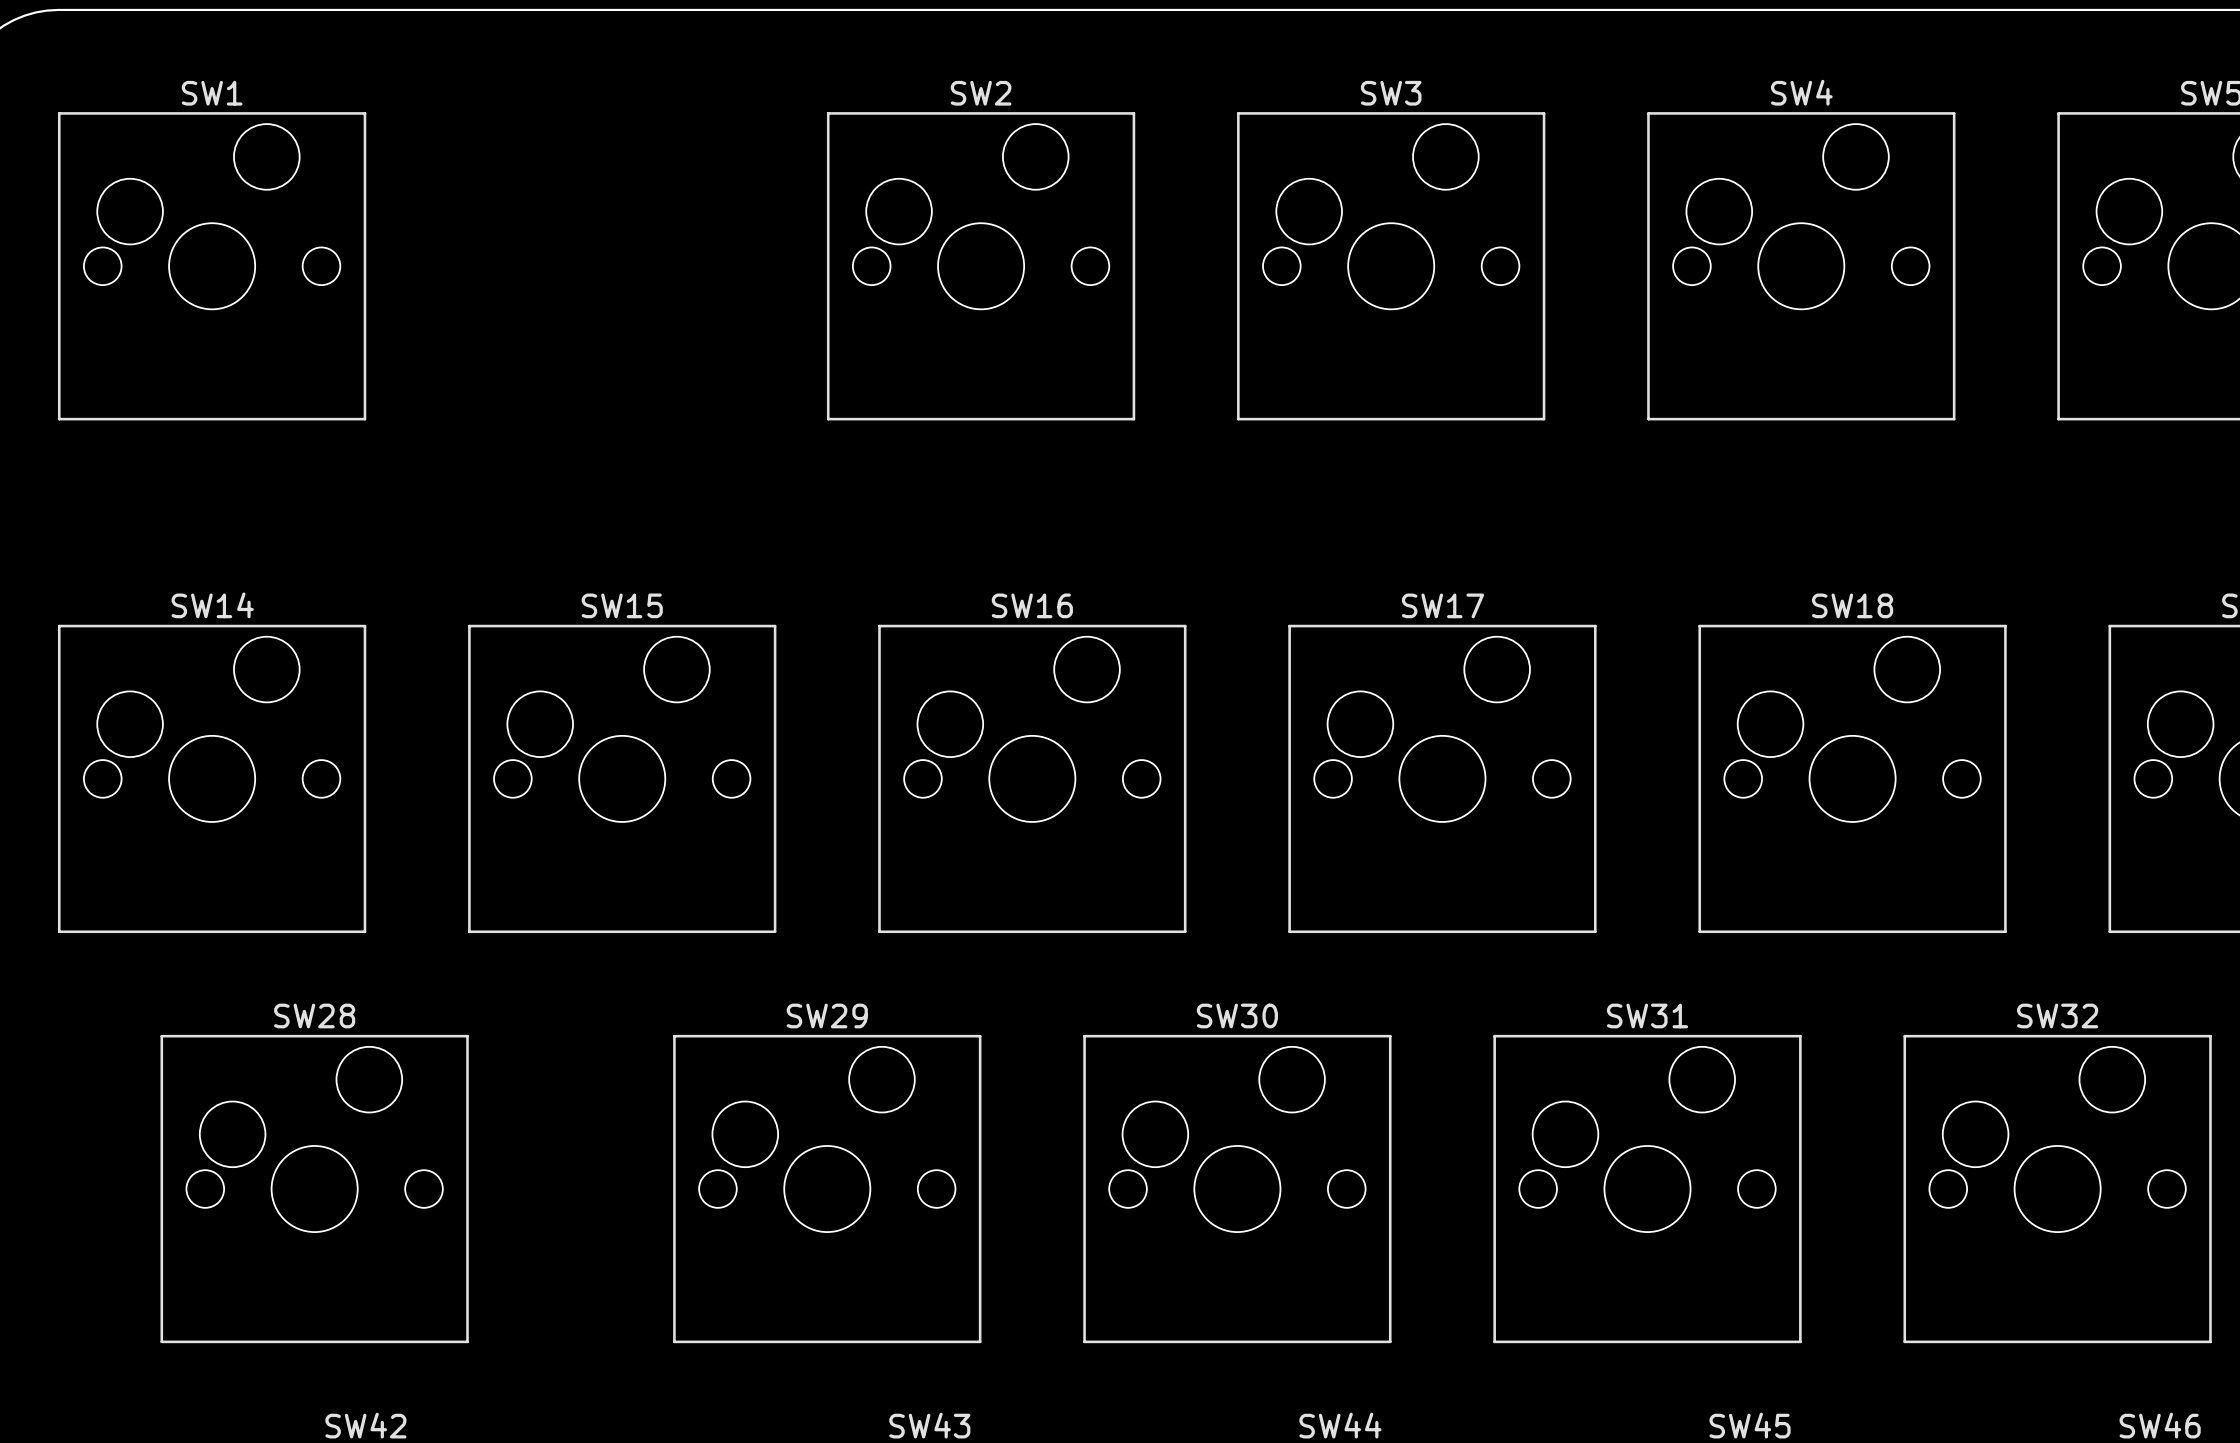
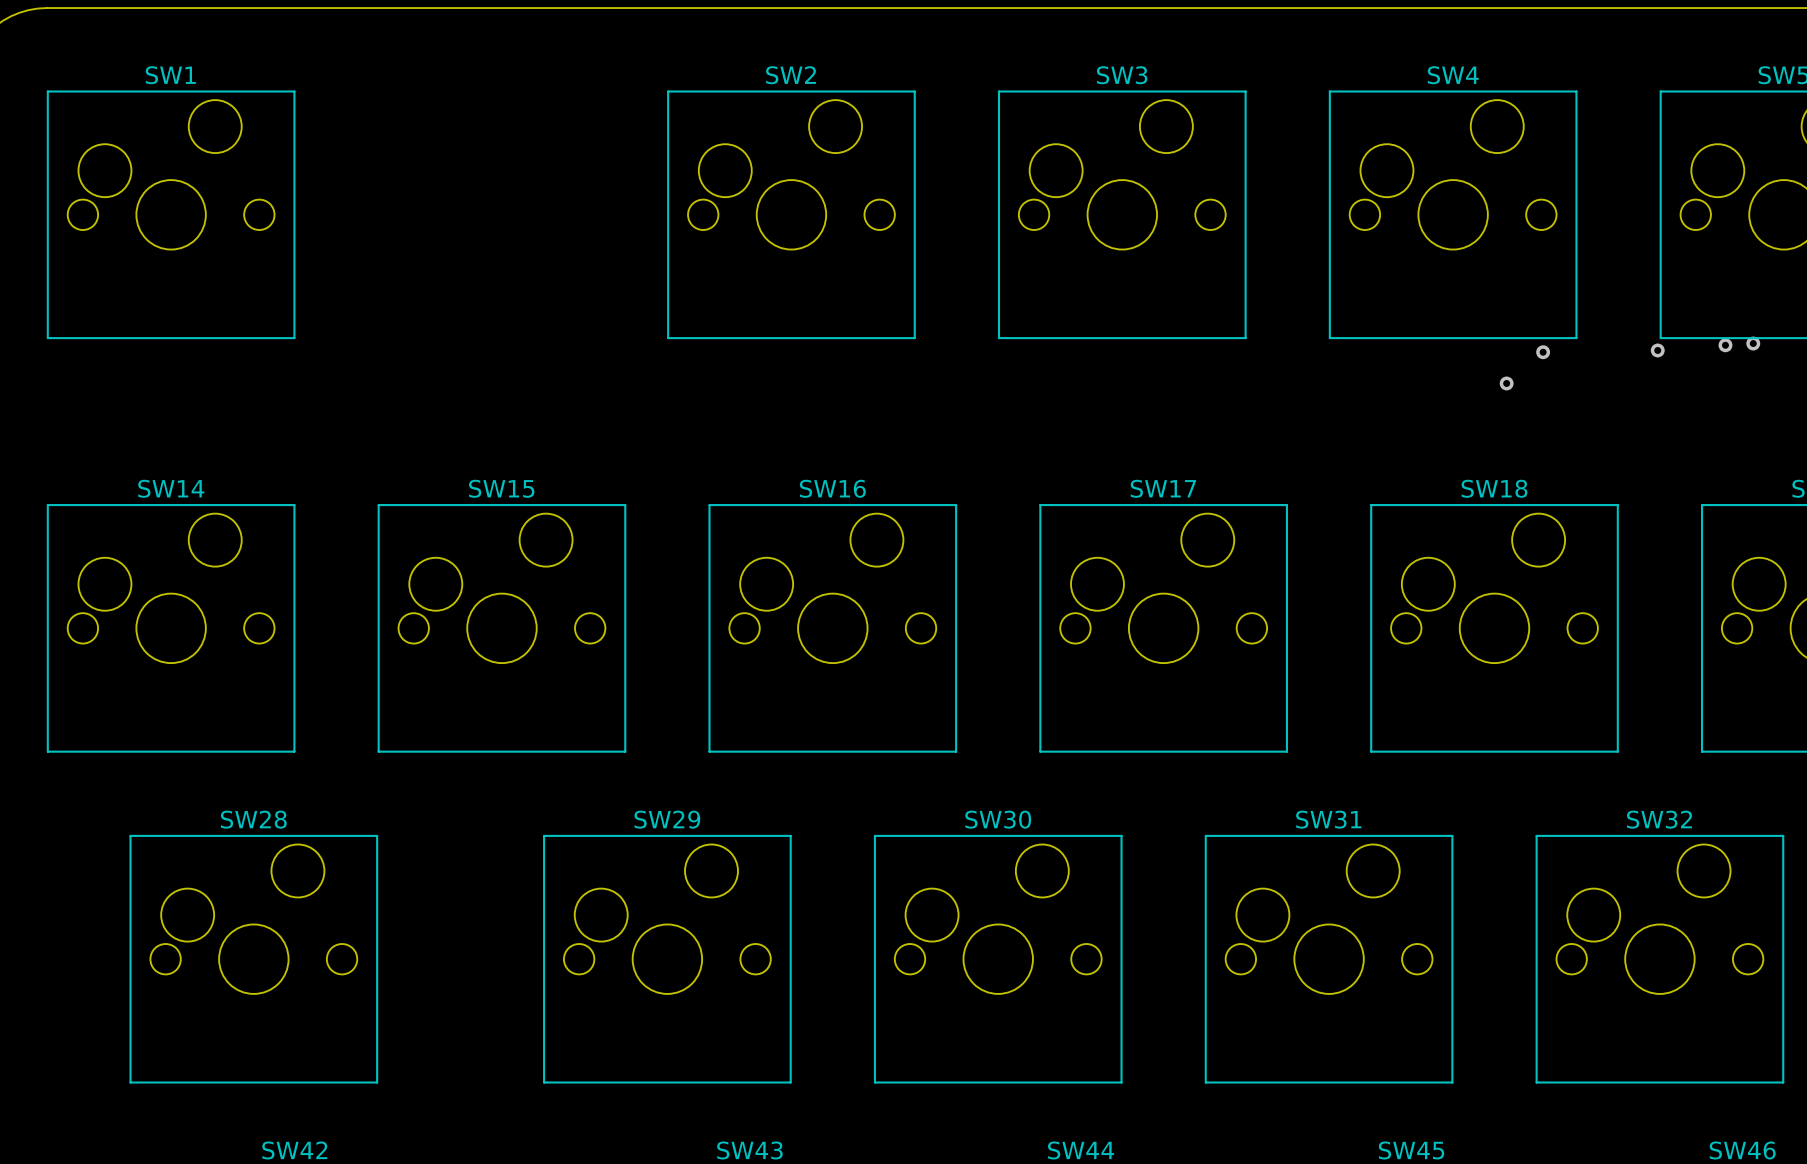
via: none -> (1753, 343)
via: none -> (1725, 345)
via: none -> (1657, 350)
via: none -> (1543, 352)
via: none -> (1506, 383)

